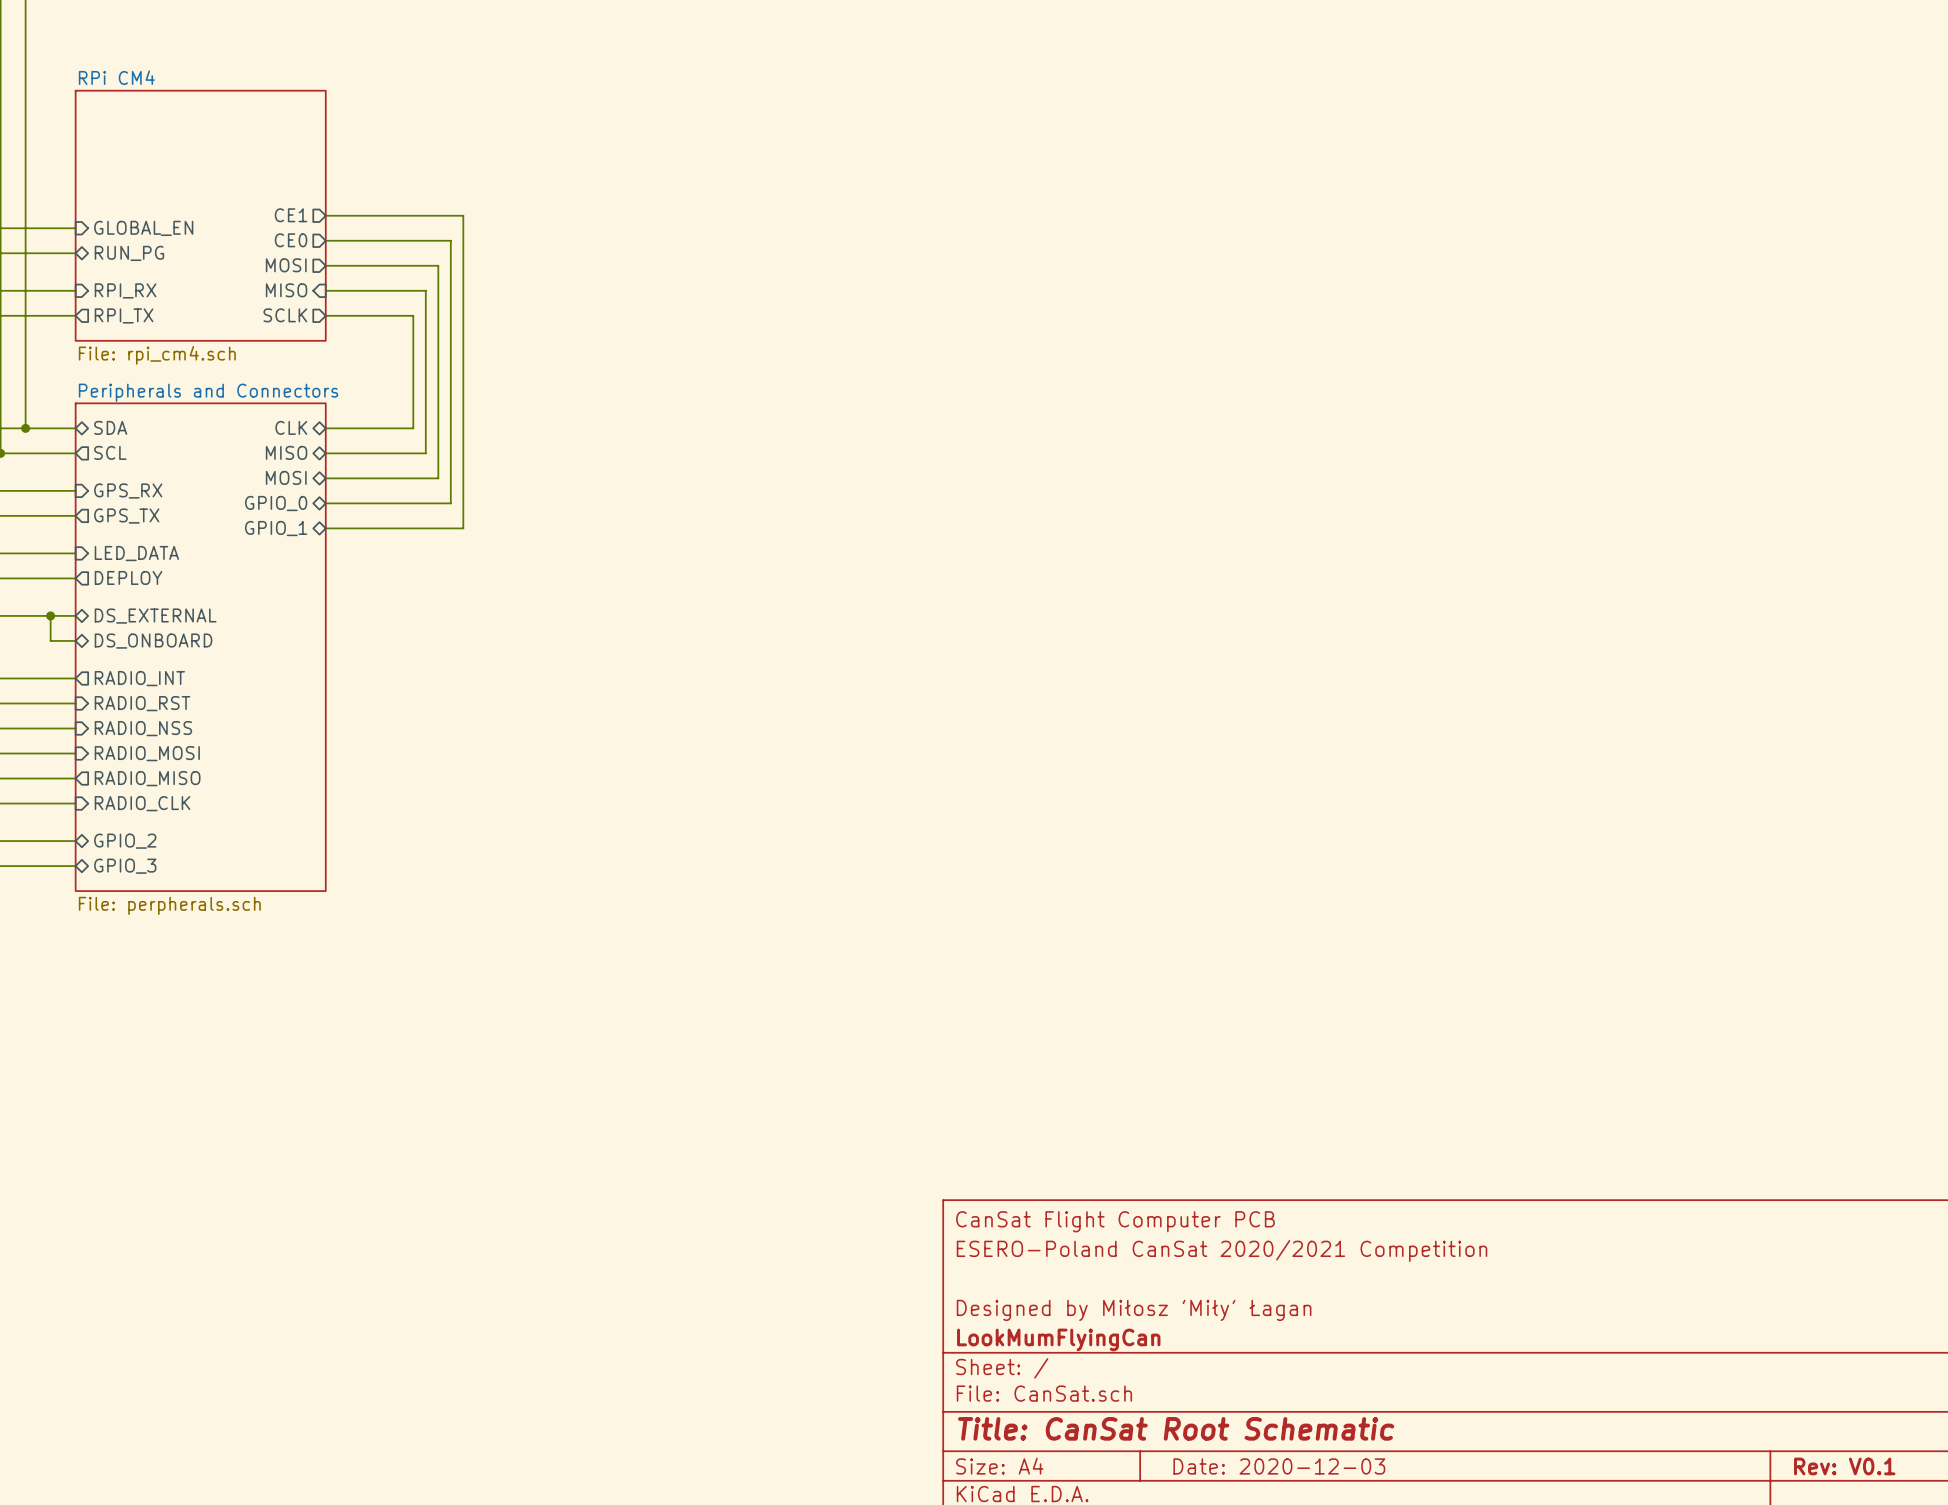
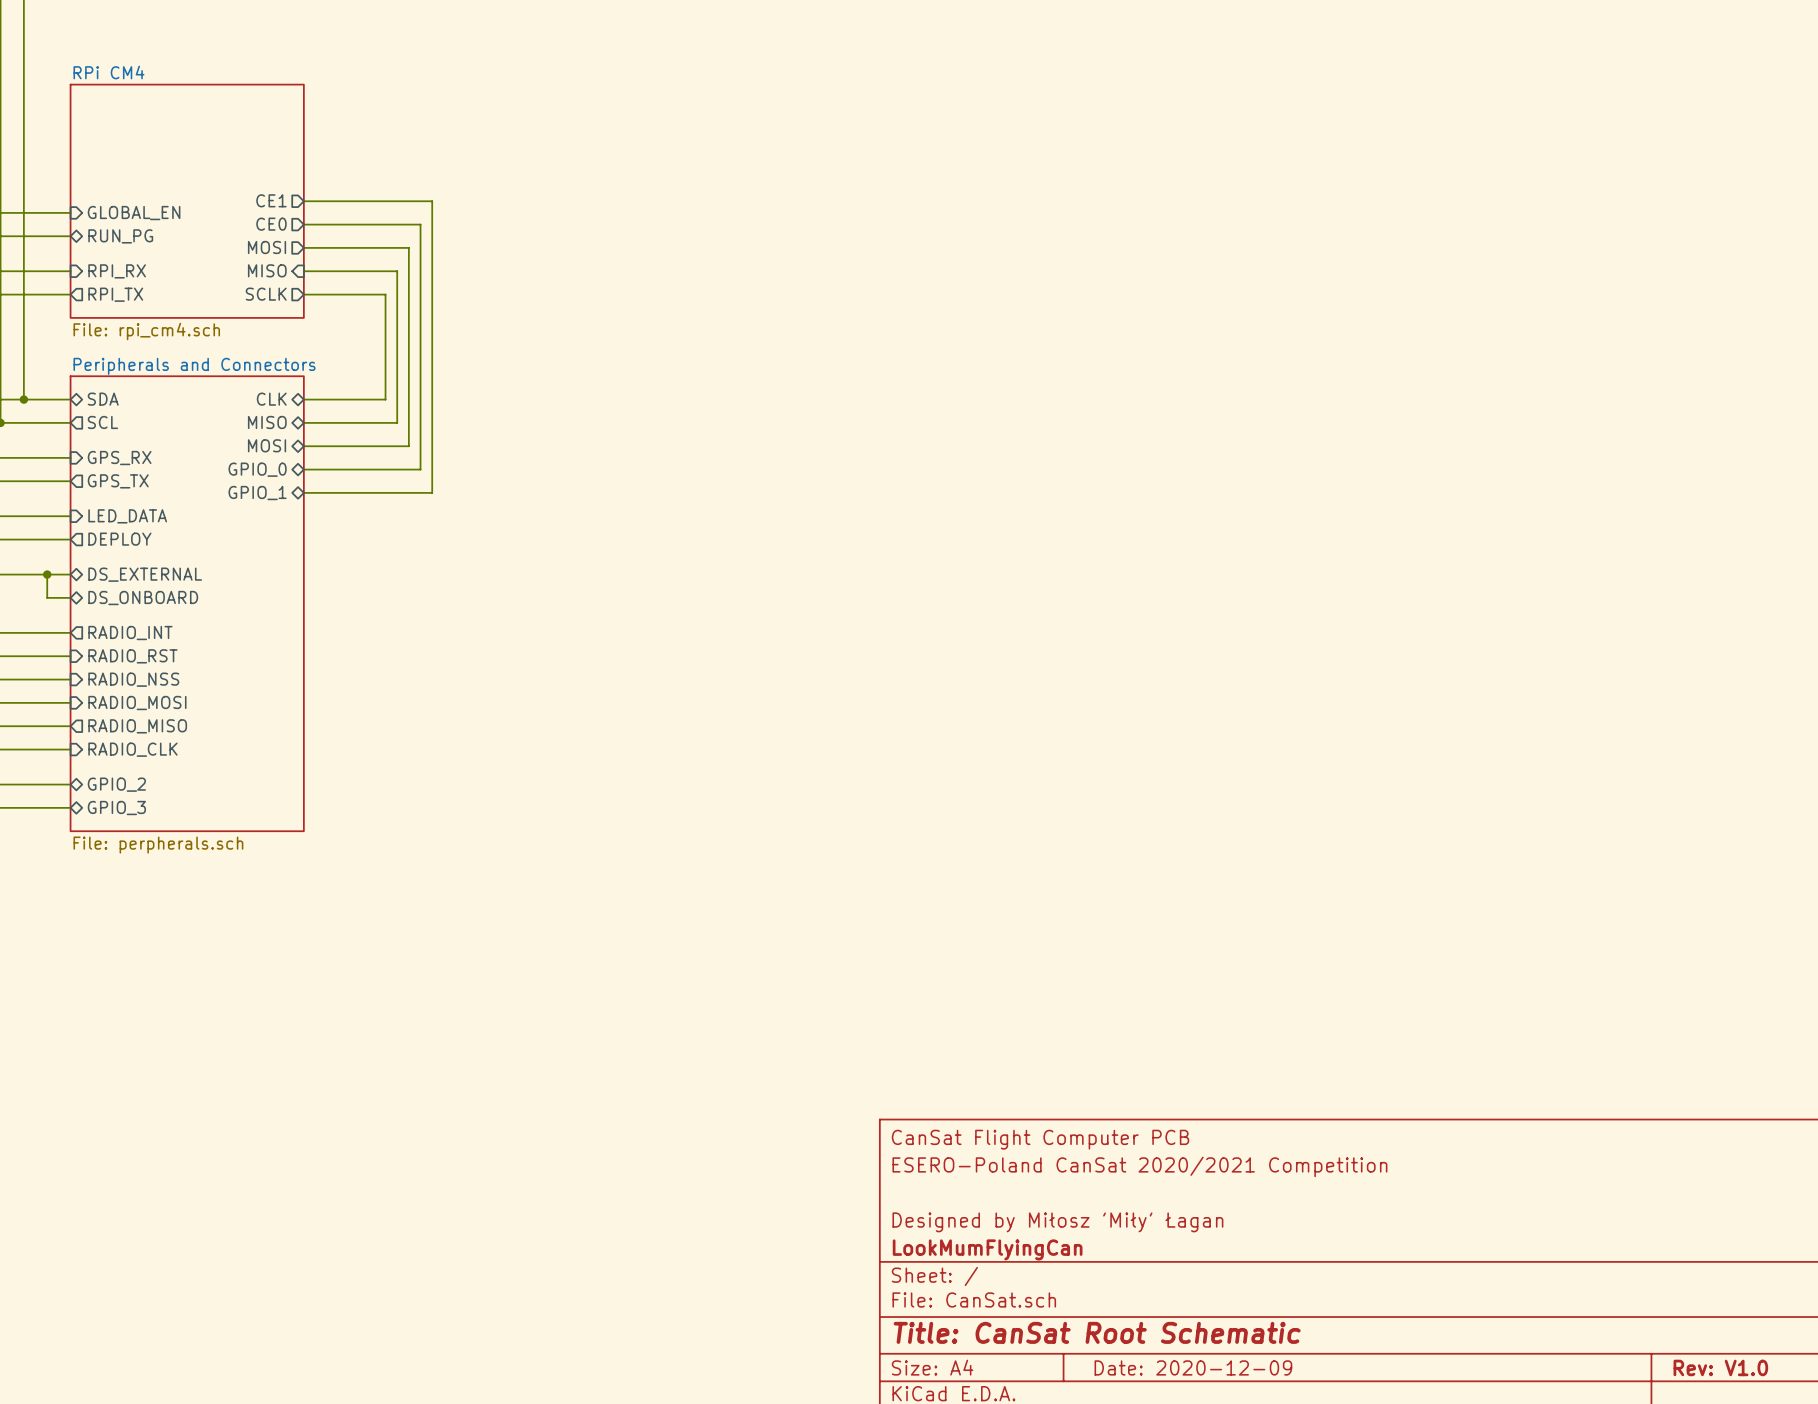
title block: Date: 2020-12-03 (1279, 1466) -> Date: 2020-12-09 (1193, 1367)
title block: Rev: V0.1 (1844, 1466) -> Rev: V1.0 (1720, 1367)

